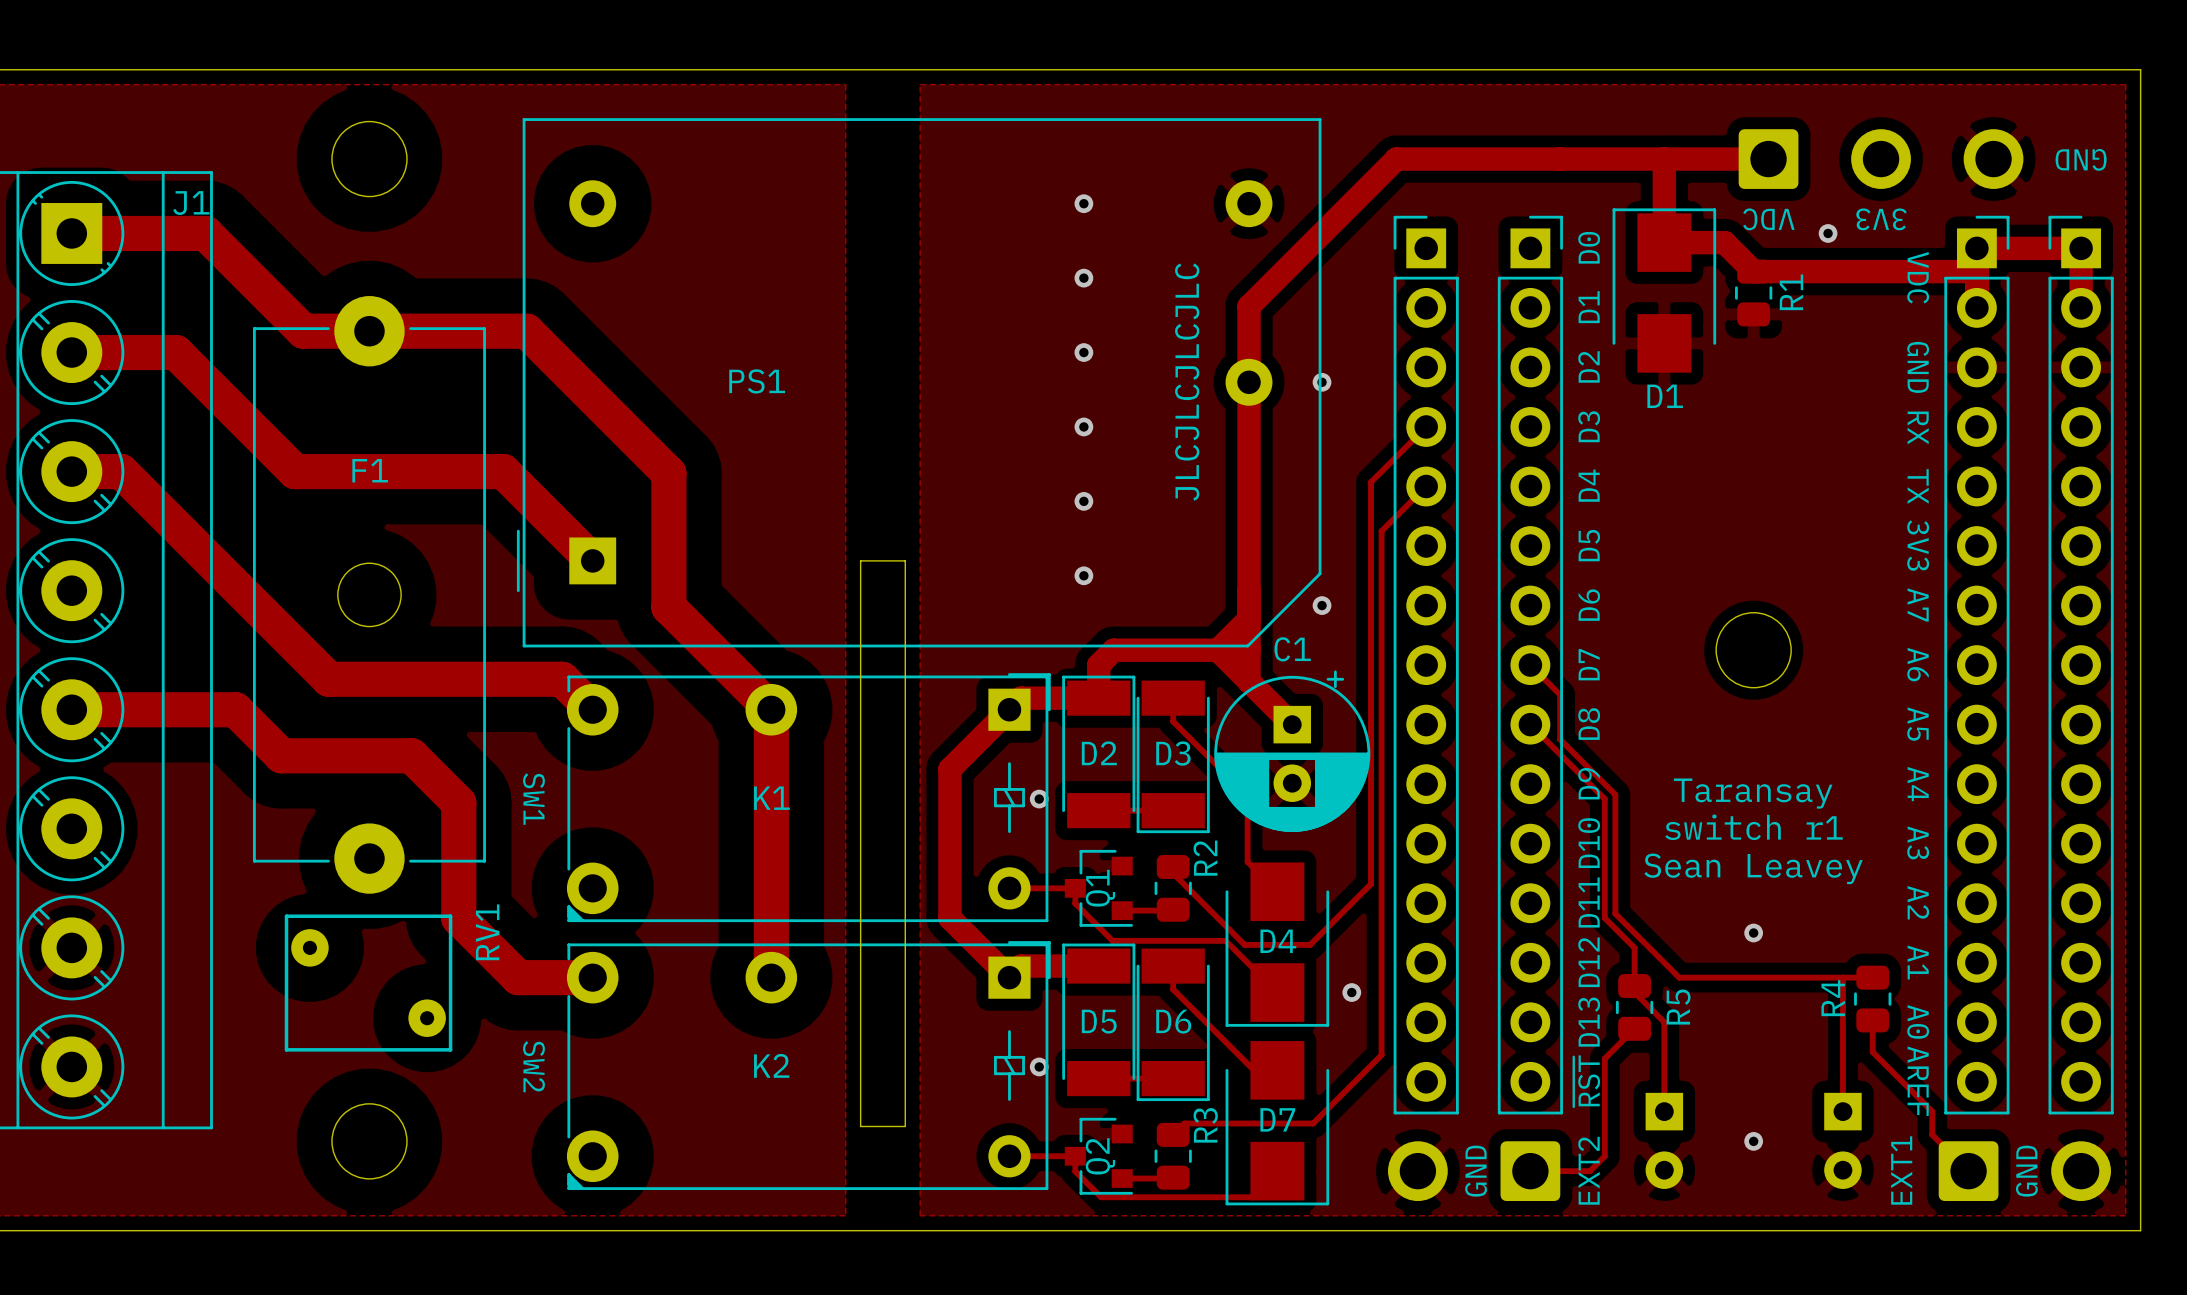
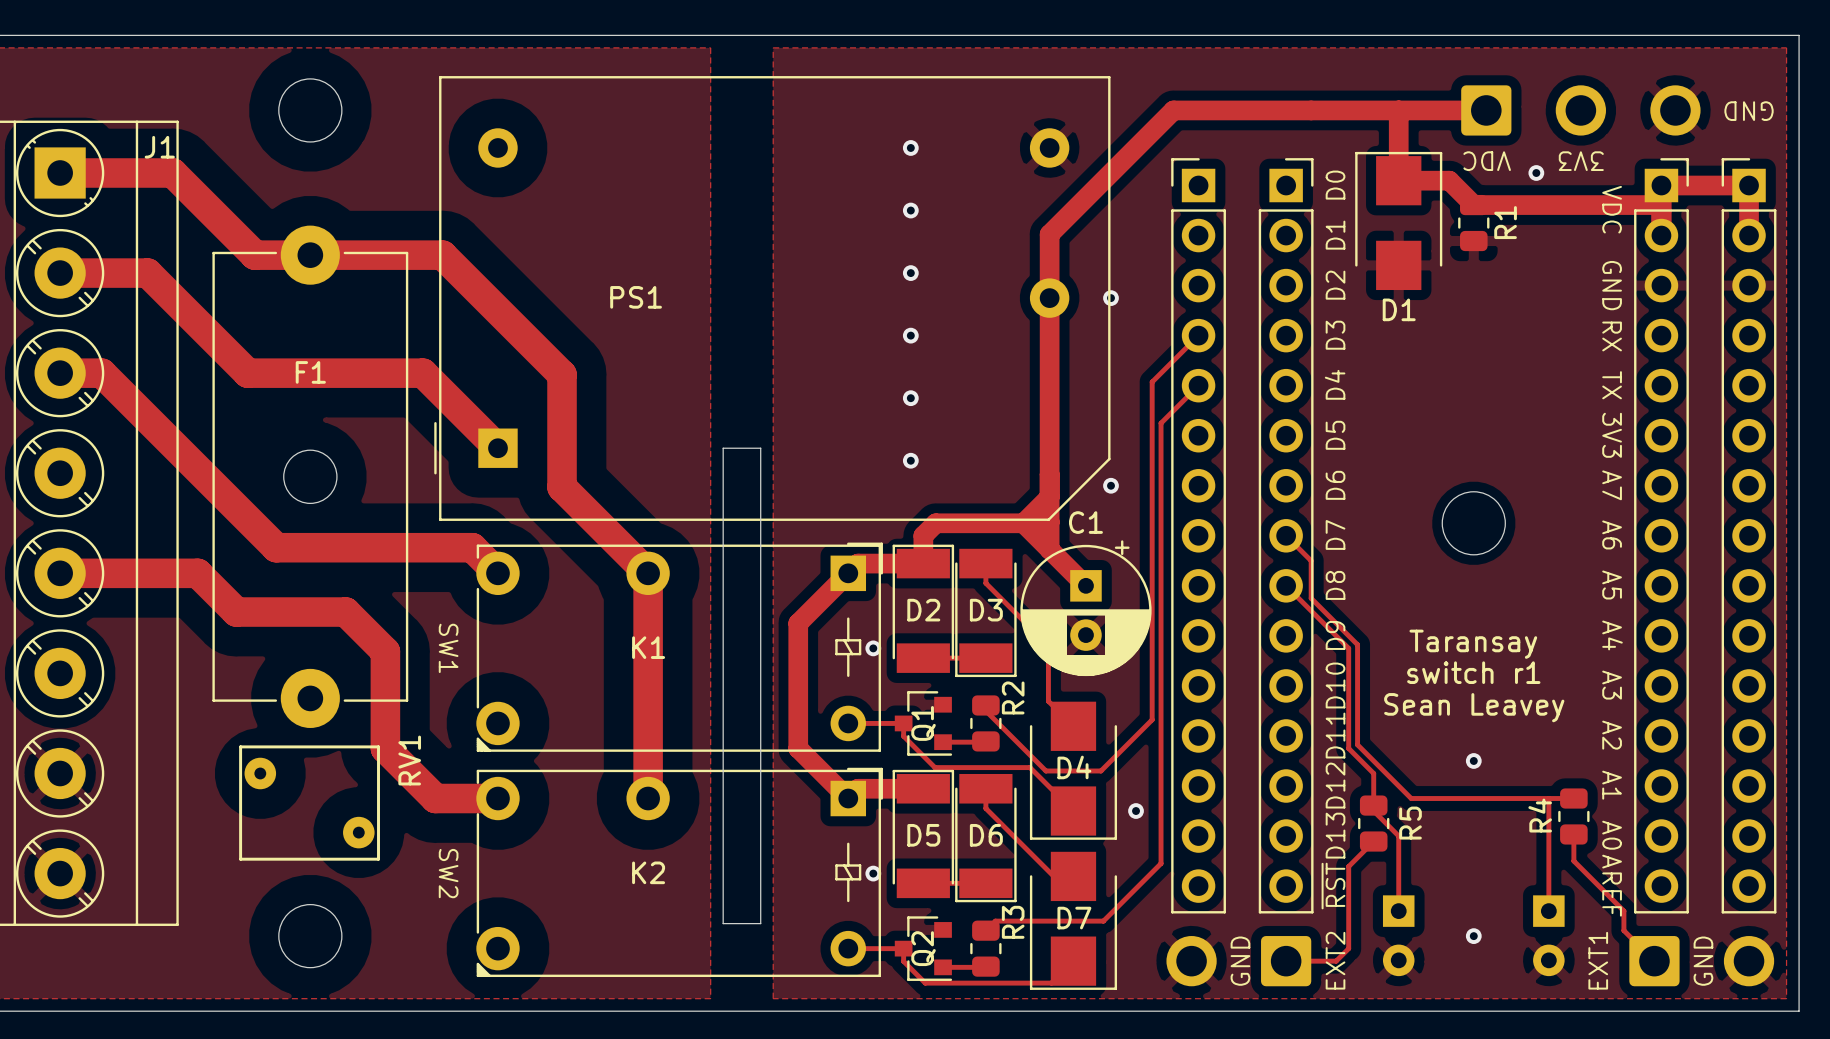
text: JLCJLCJLCJLC (1187, 382) -> none

